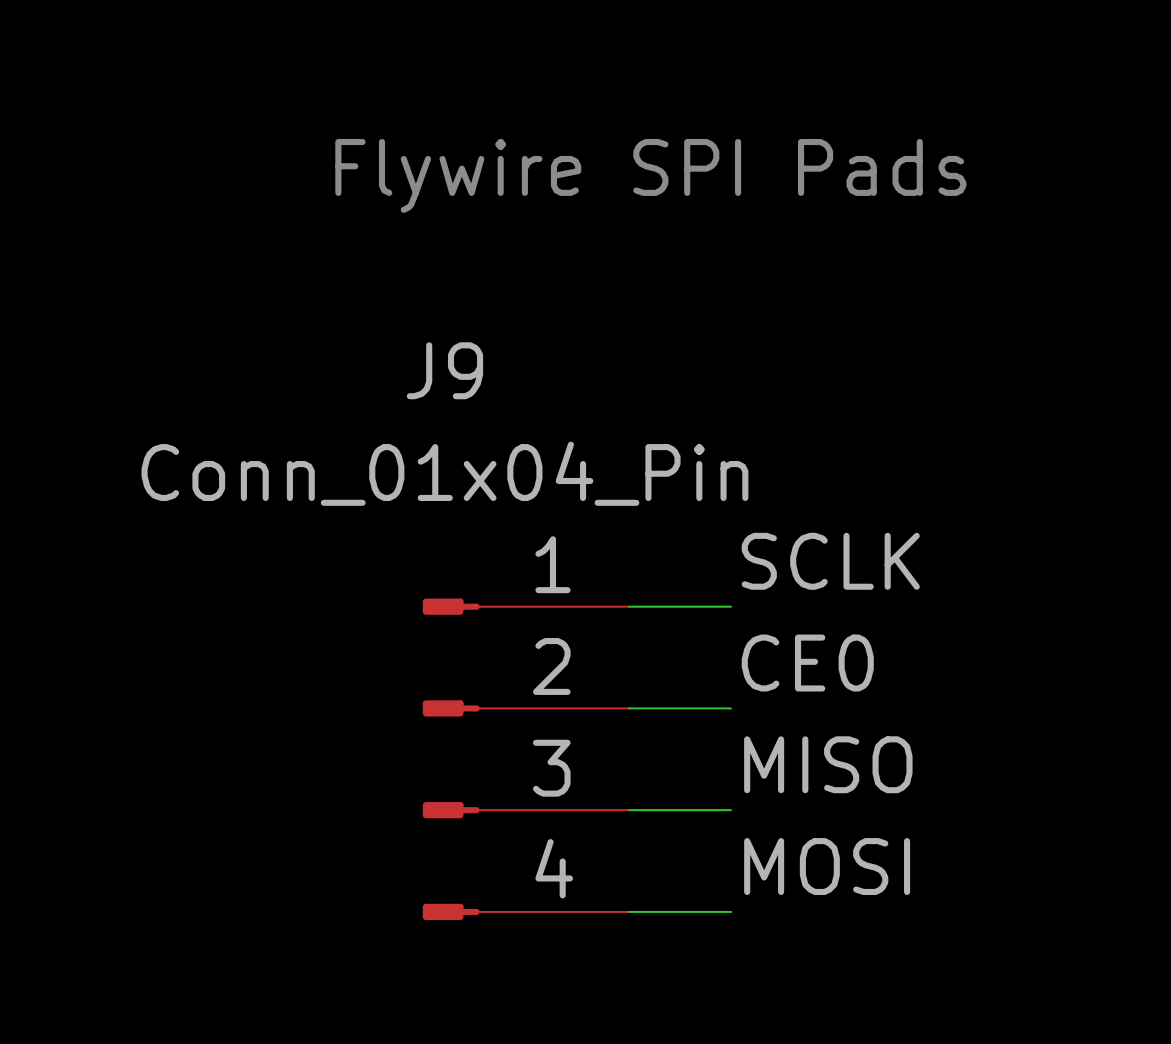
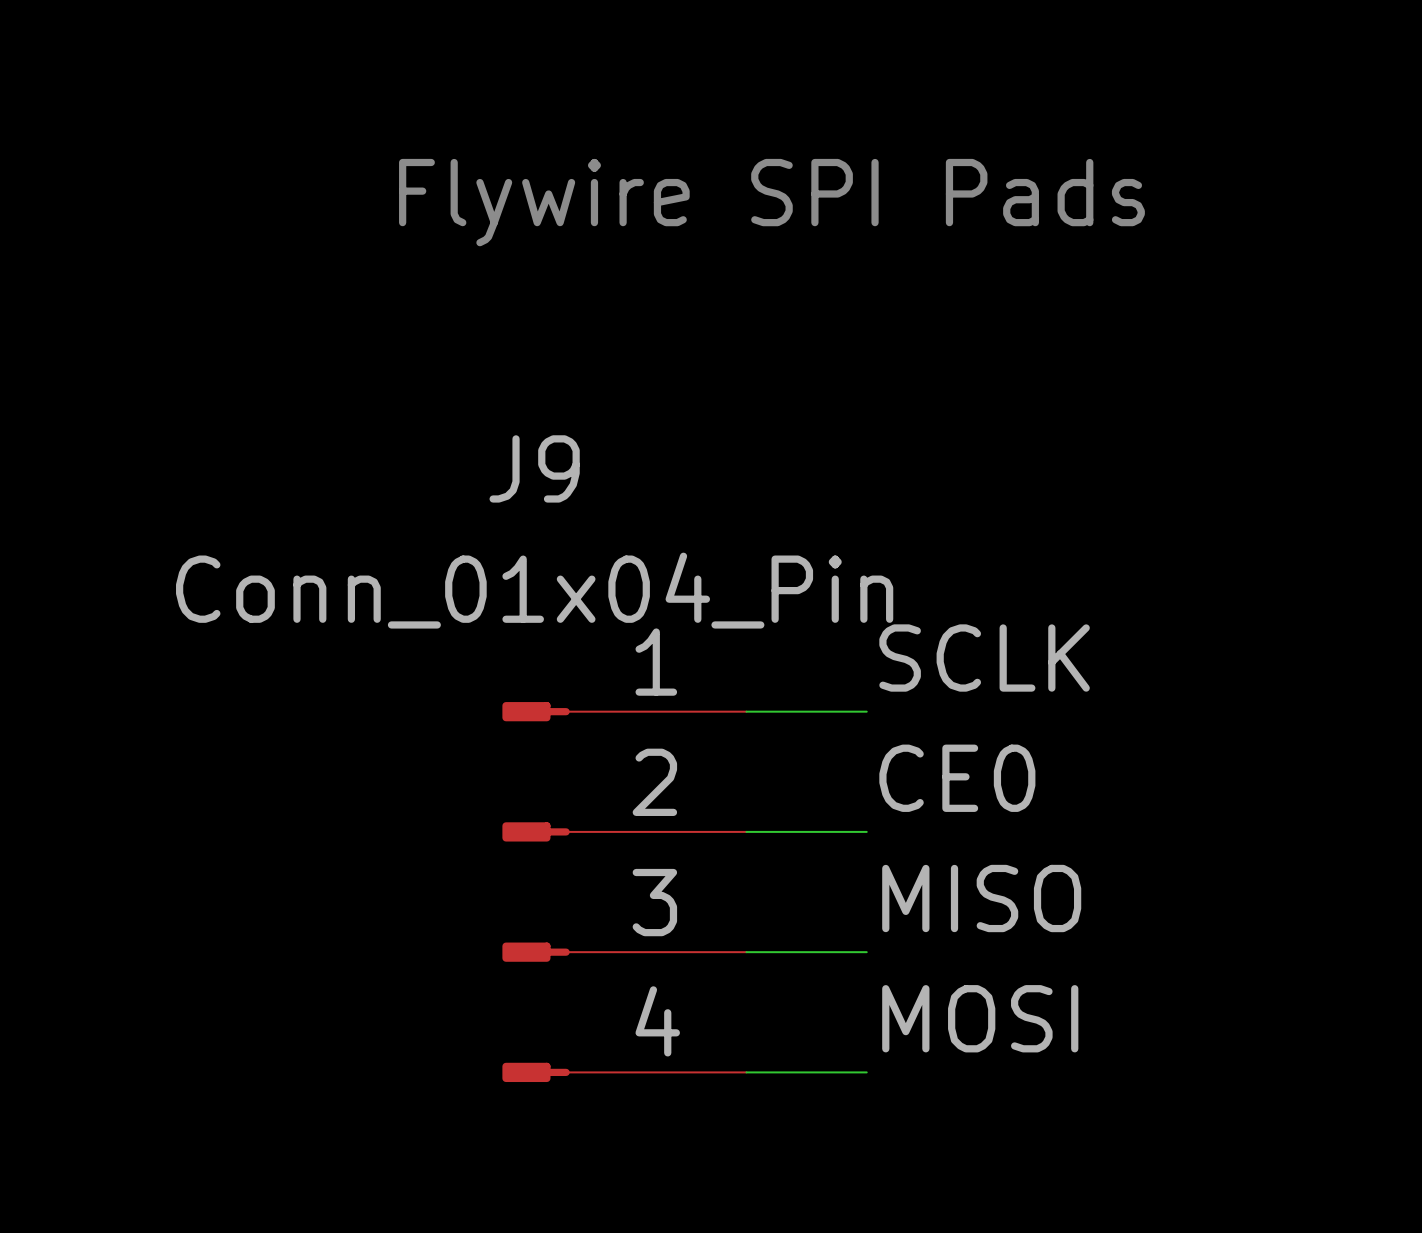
J9 name position: J9 (444, 370) -> J9 (534, 468)
J9 value position: Conn_01x04_Pin (444, 473) -> Conn_01x04_Pin (534, 590)

